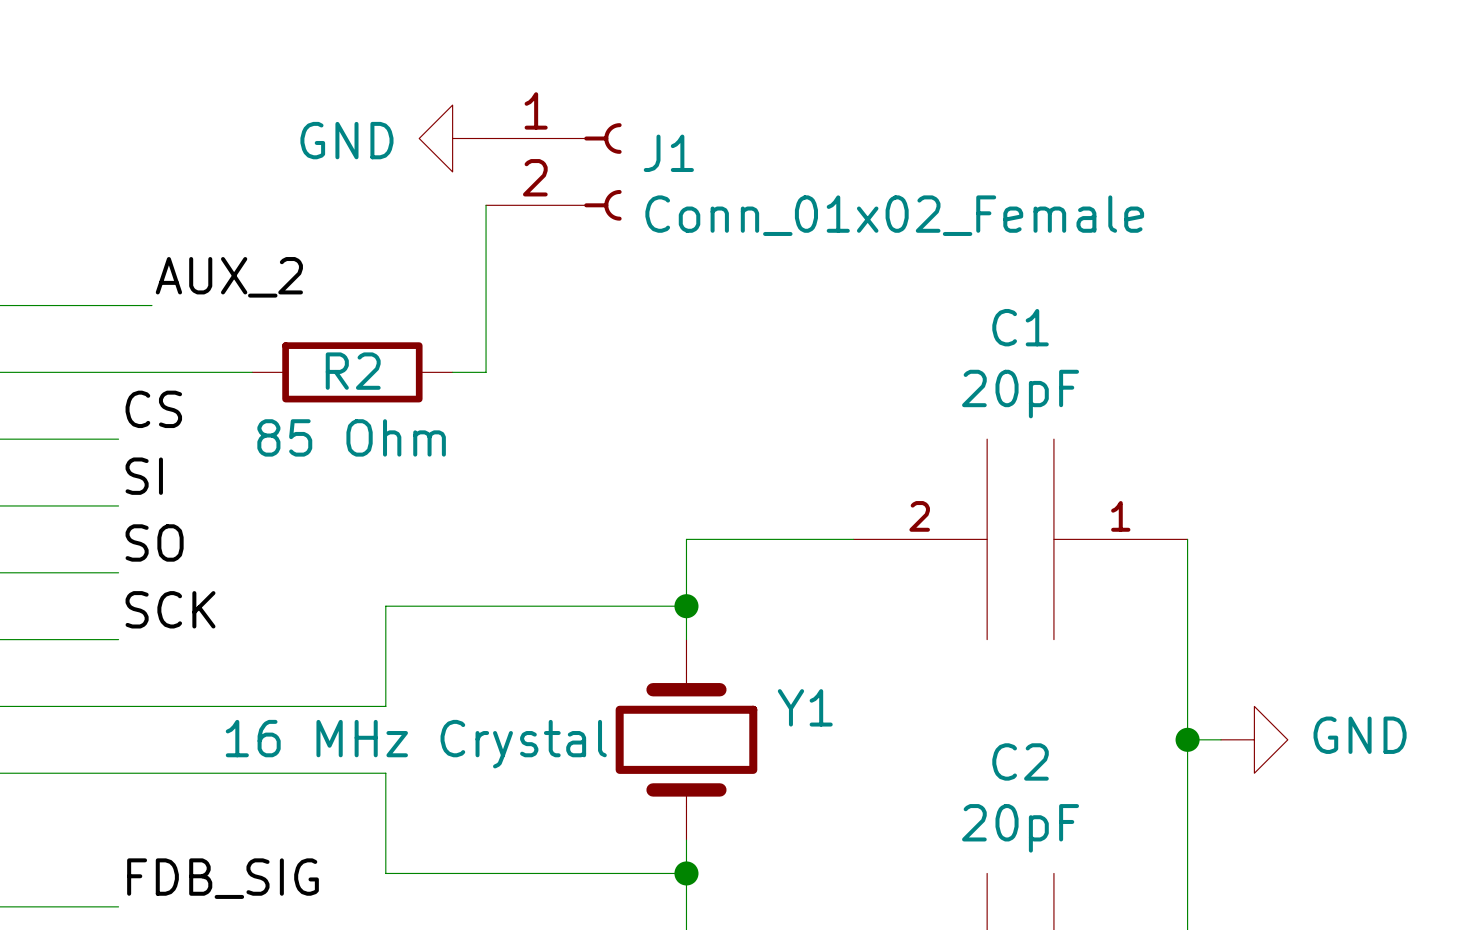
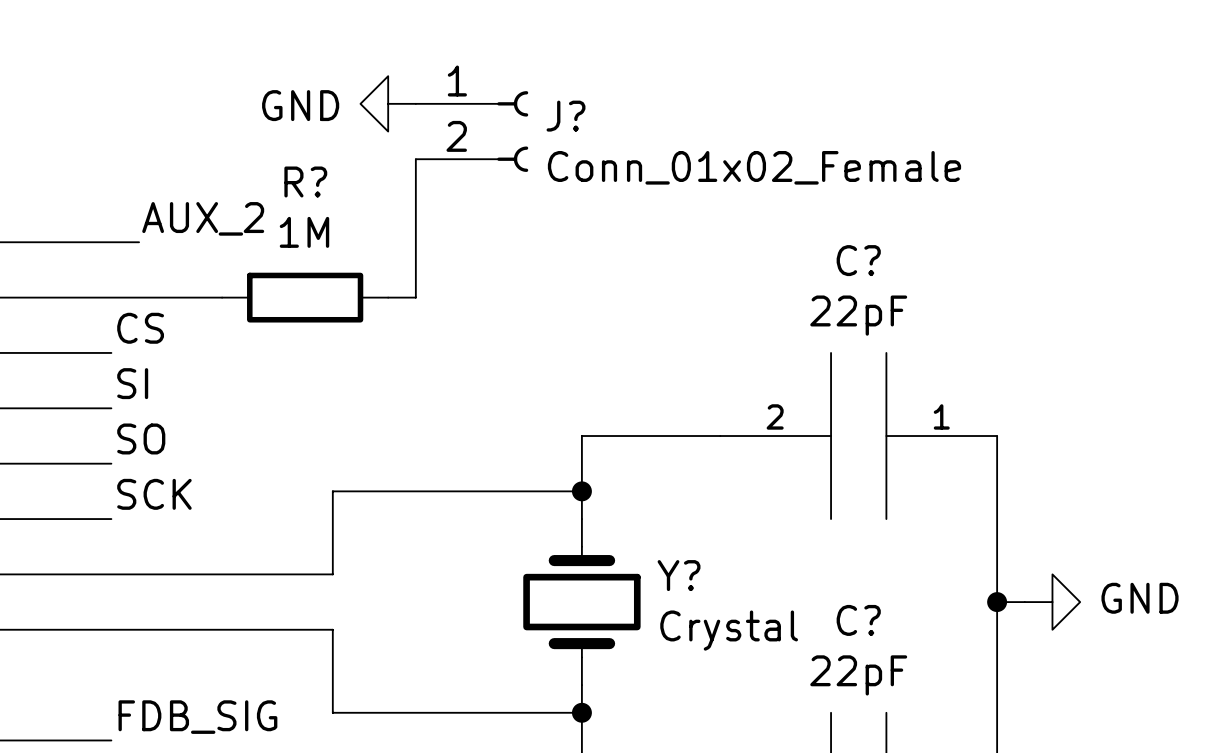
J1 name: J1 (668, 153) -> J? (566, 116)
C1 name: C1 (1020, 327) -> C? (858, 260)
R2 name: R2 (353, 371) -> R? (305, 181)
C1 value: 20pF (1020, 394) -> 22pF (858, 315)
R2 value: 85 Ohm (351, 437) -> 1M (304, 232)
Y1 name: Y1 (805, 707) -> Y? (679, 575)
Y1 value: 16 MHz Crystal (416, 744) -> Crystal (729, 630)
C2 name: C2 (1020, 761) -> C? (858, 620)
C2 value: 20pF (1020, 828) -> 22pF (858, 675)

